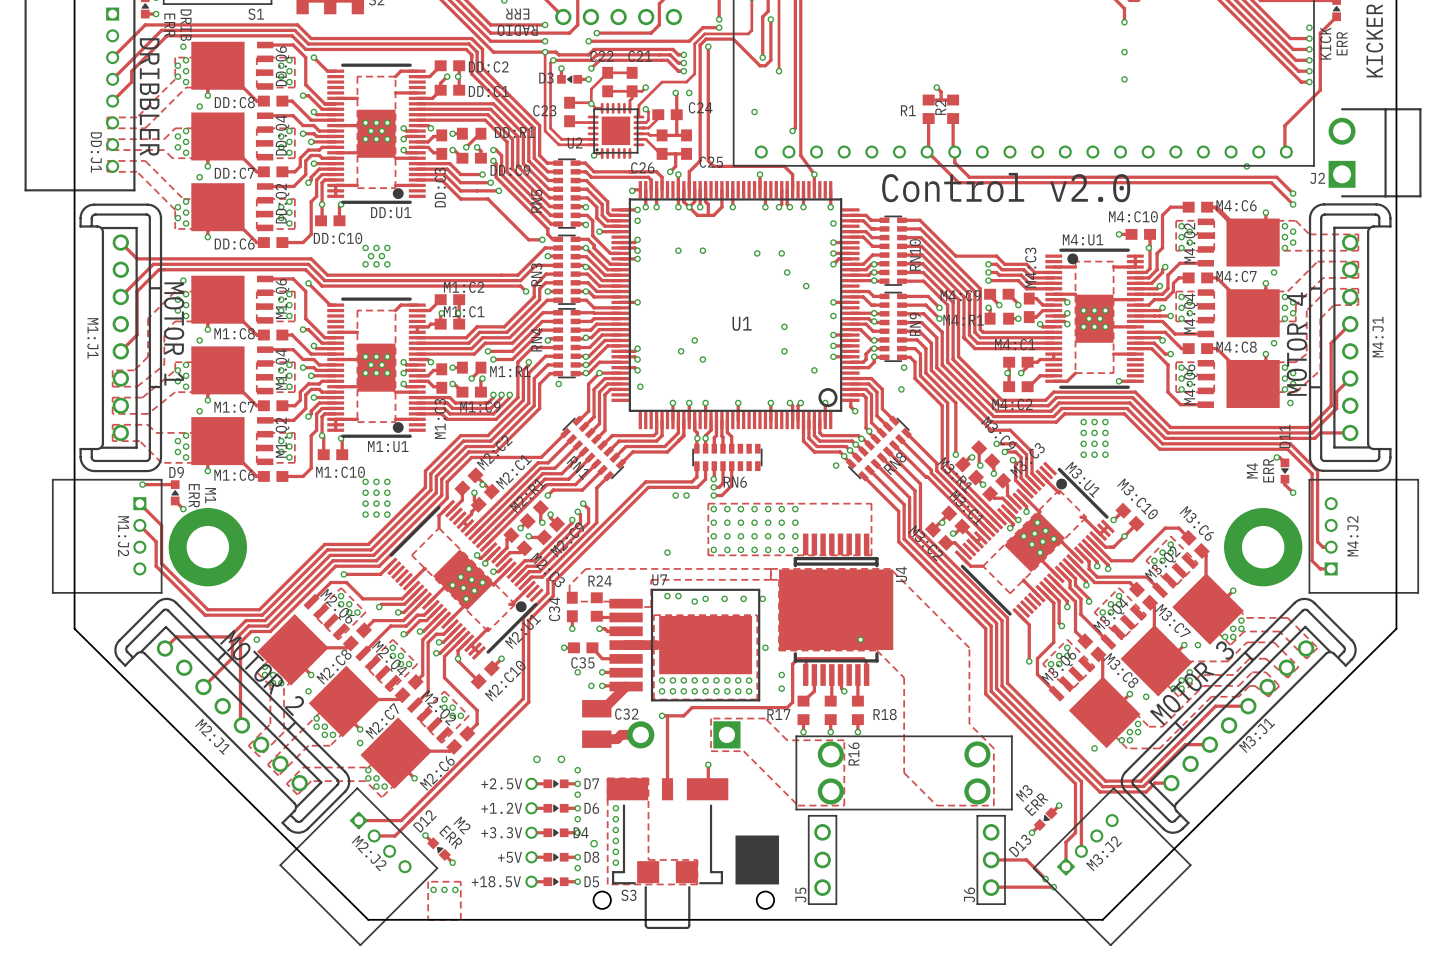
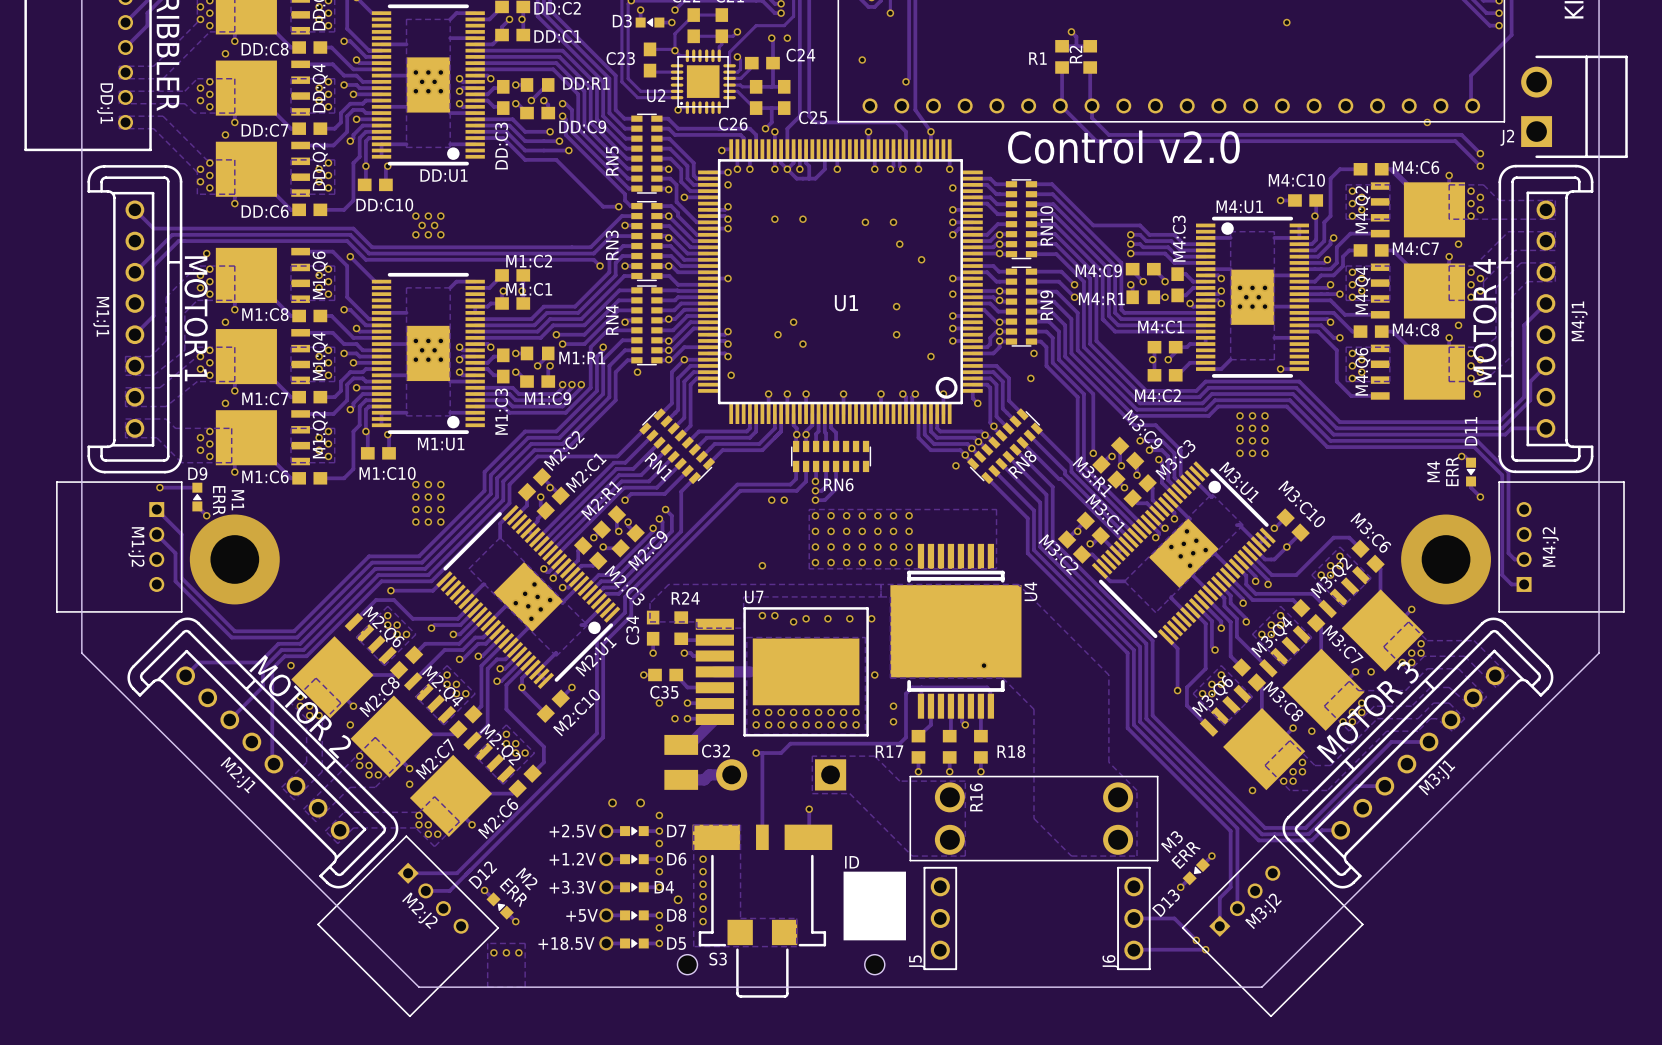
text: none -> ID (852, 862)
drawing: none -> [843, 871, 906, 941]
drawing: [735, 835, 780, 885] -> none

